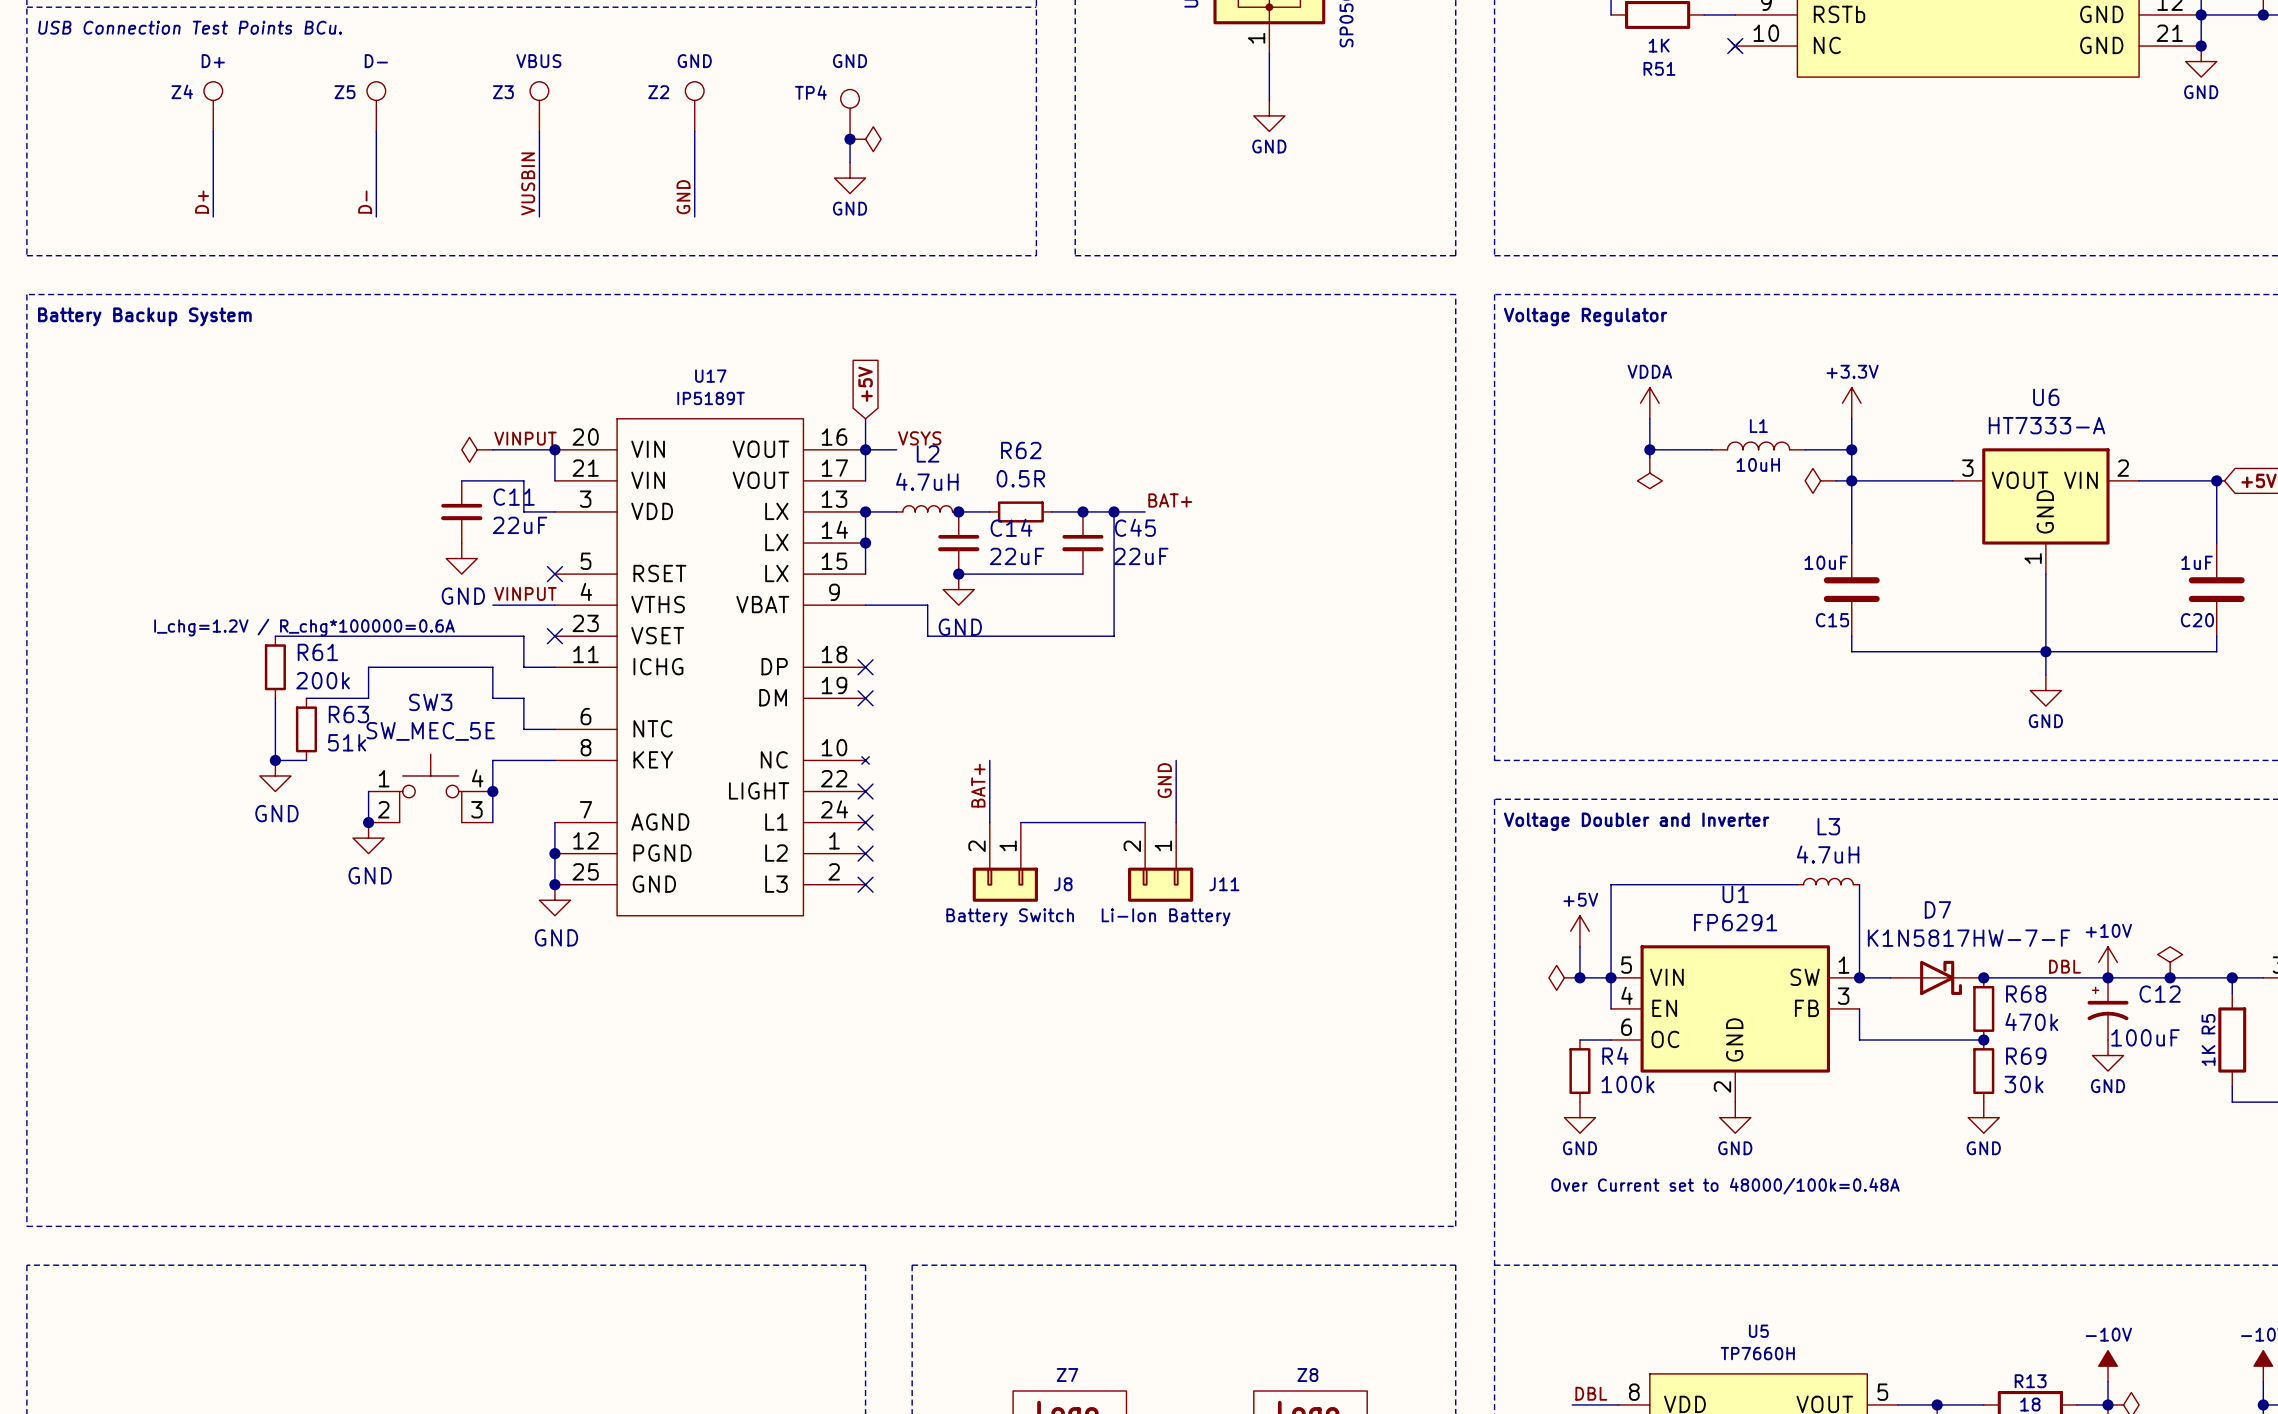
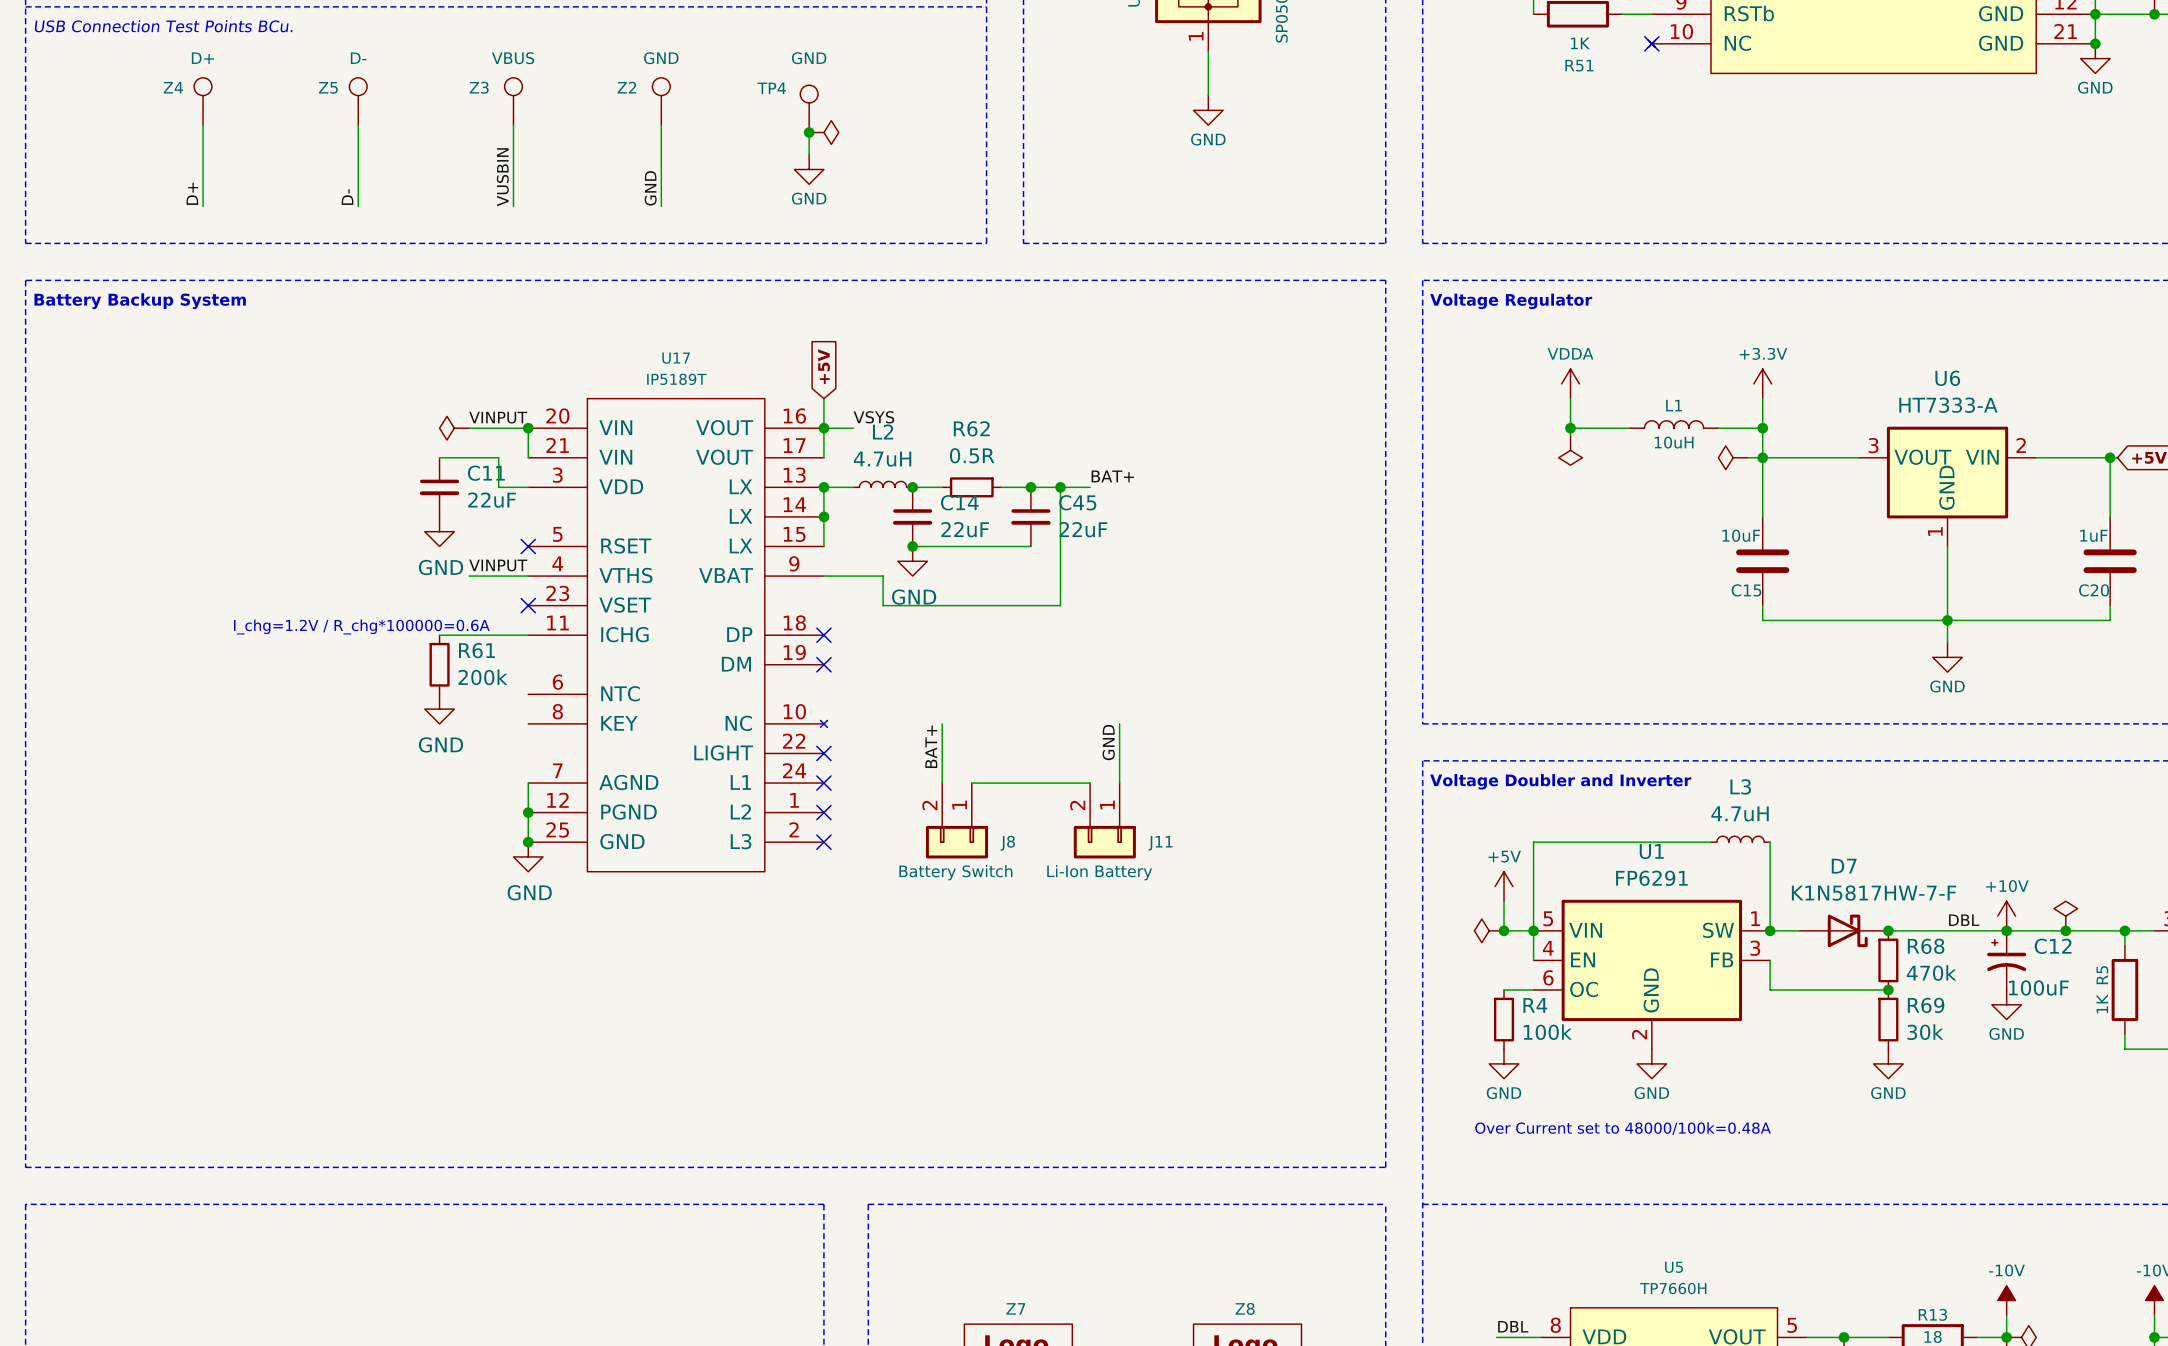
text position: I_chg=1.2V / R_chg*100000=0.6A (304, 627) -> I_chg=1.2V / R_chg*100000=0.6A (361, 627)
wire: (275, 636) (523, 636) (523, 667) -> none
R61 position: (275, 667) -> (439, 664)
wire: (461, 667) (368, 667) (368, 698) (306, 698) -> none
wire: (492, 667) (492, 698) (523, 698) (523, 729) (554, 729) -> (469, 635) (498, 635)
wire: (275, 698) (275, 760) (306, 760) -> none
R63: 51k (306, 729) -> none
power symbol: none -> GND (439, 709)
junction: (275, 760) -> none
wire: (554, 760) (492, 760) (492, 822) -> none
power symbol: GND (275, 775) -> none
SW3: SW_MEC_5E (430, 788) -> none
wire: (368, 791) (368, 822) -> none
junction: (492, 791) -> none
junction: (368, 822) -> none
power symbol: GND (368, 838) -> none

